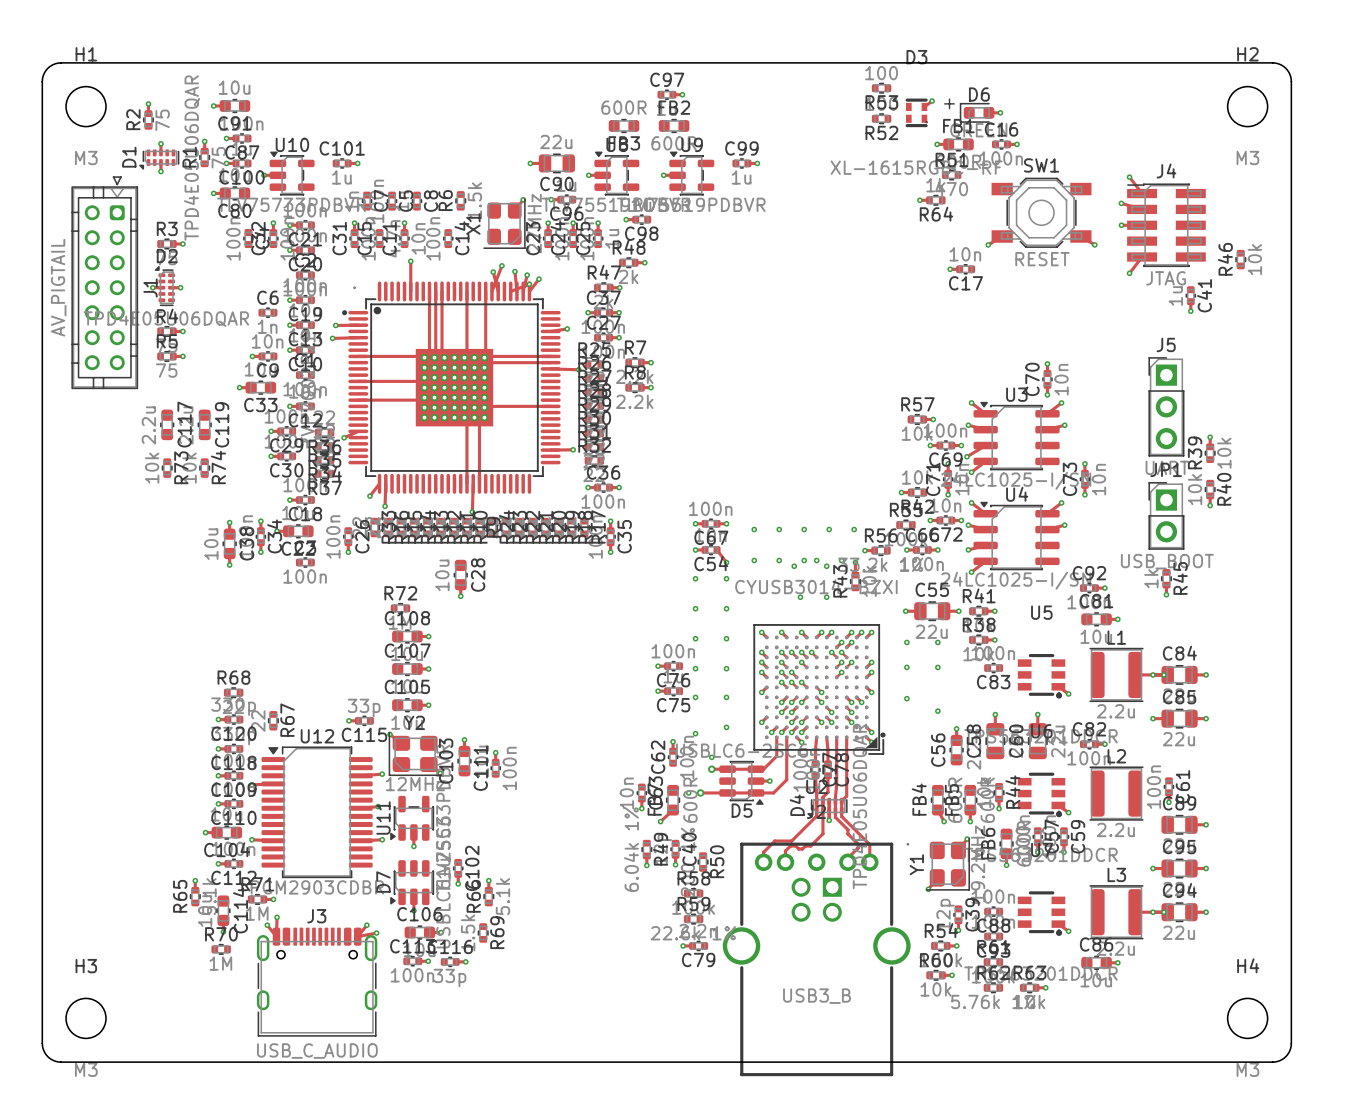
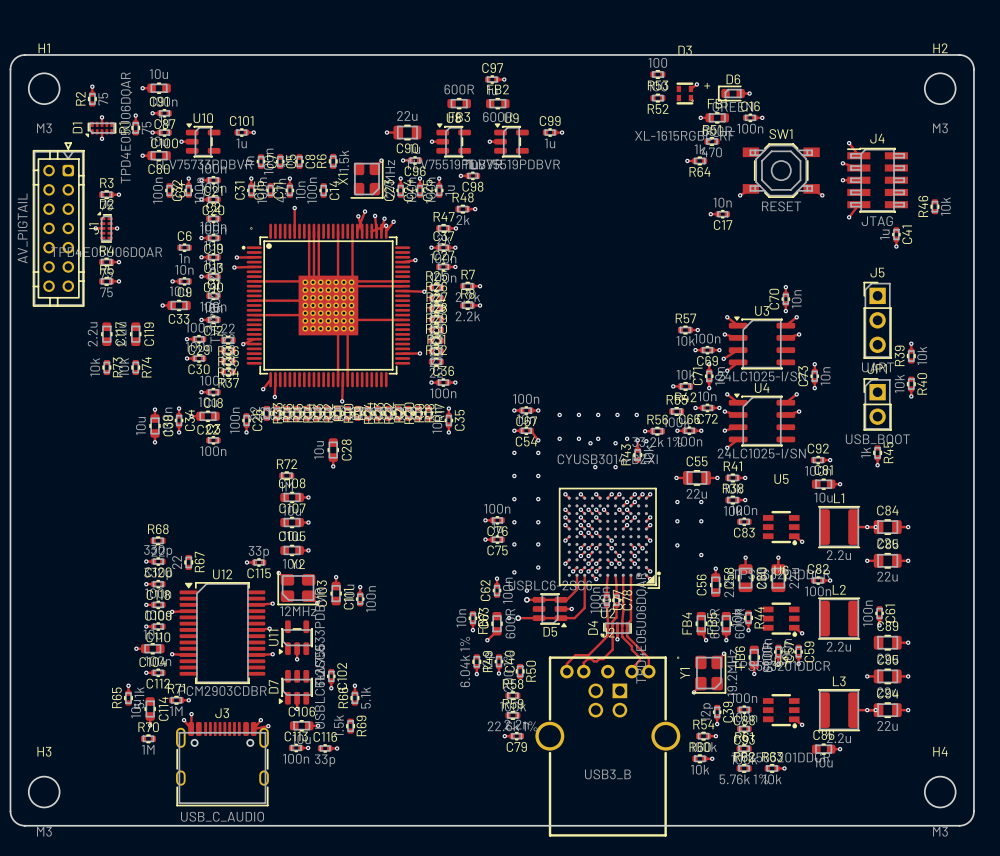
via position: (816, 560) -> (646, 441)

